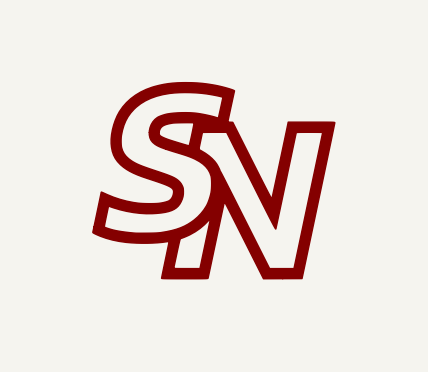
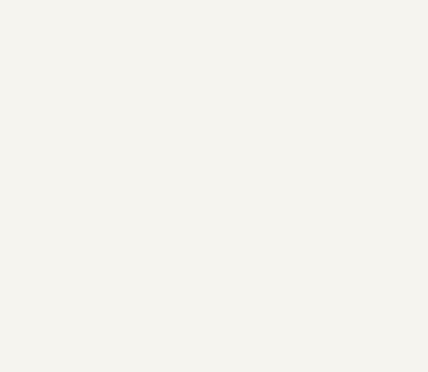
part: (213, 180) -> none

